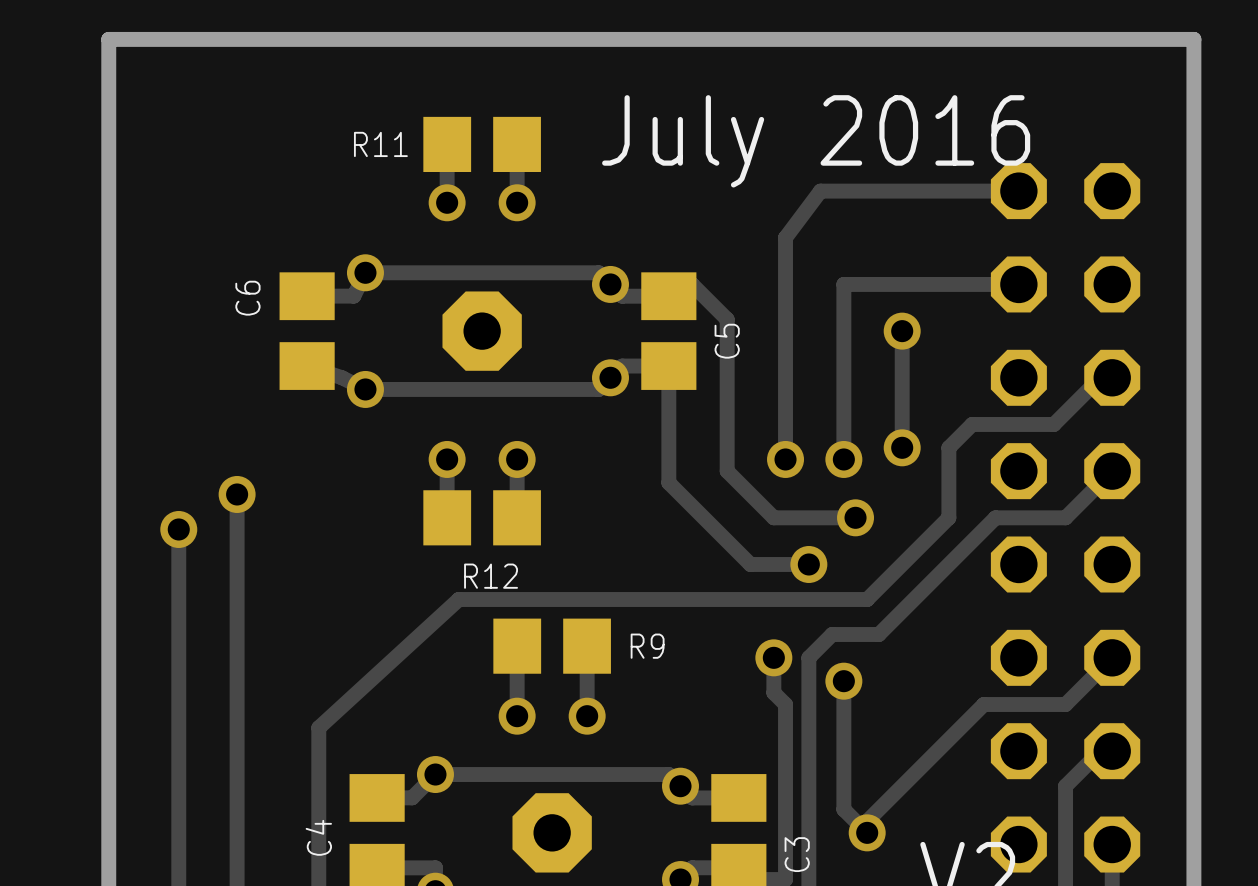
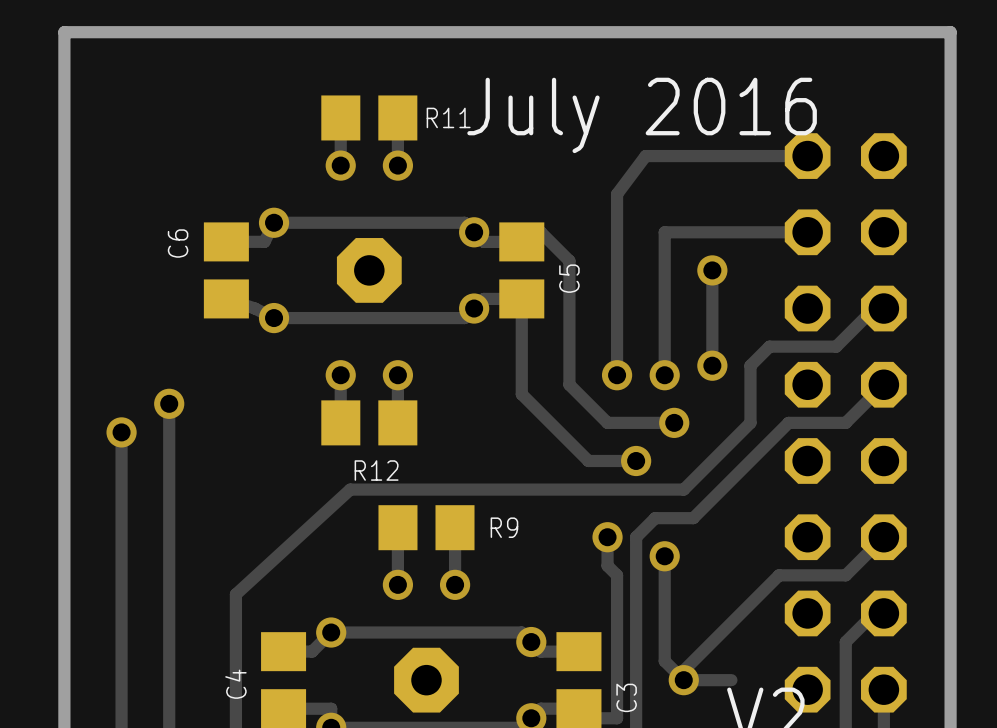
R11 name position: R11 (380, 144) -> R11 (448, 117)
track: none -> (731, 680) (683, 680)

